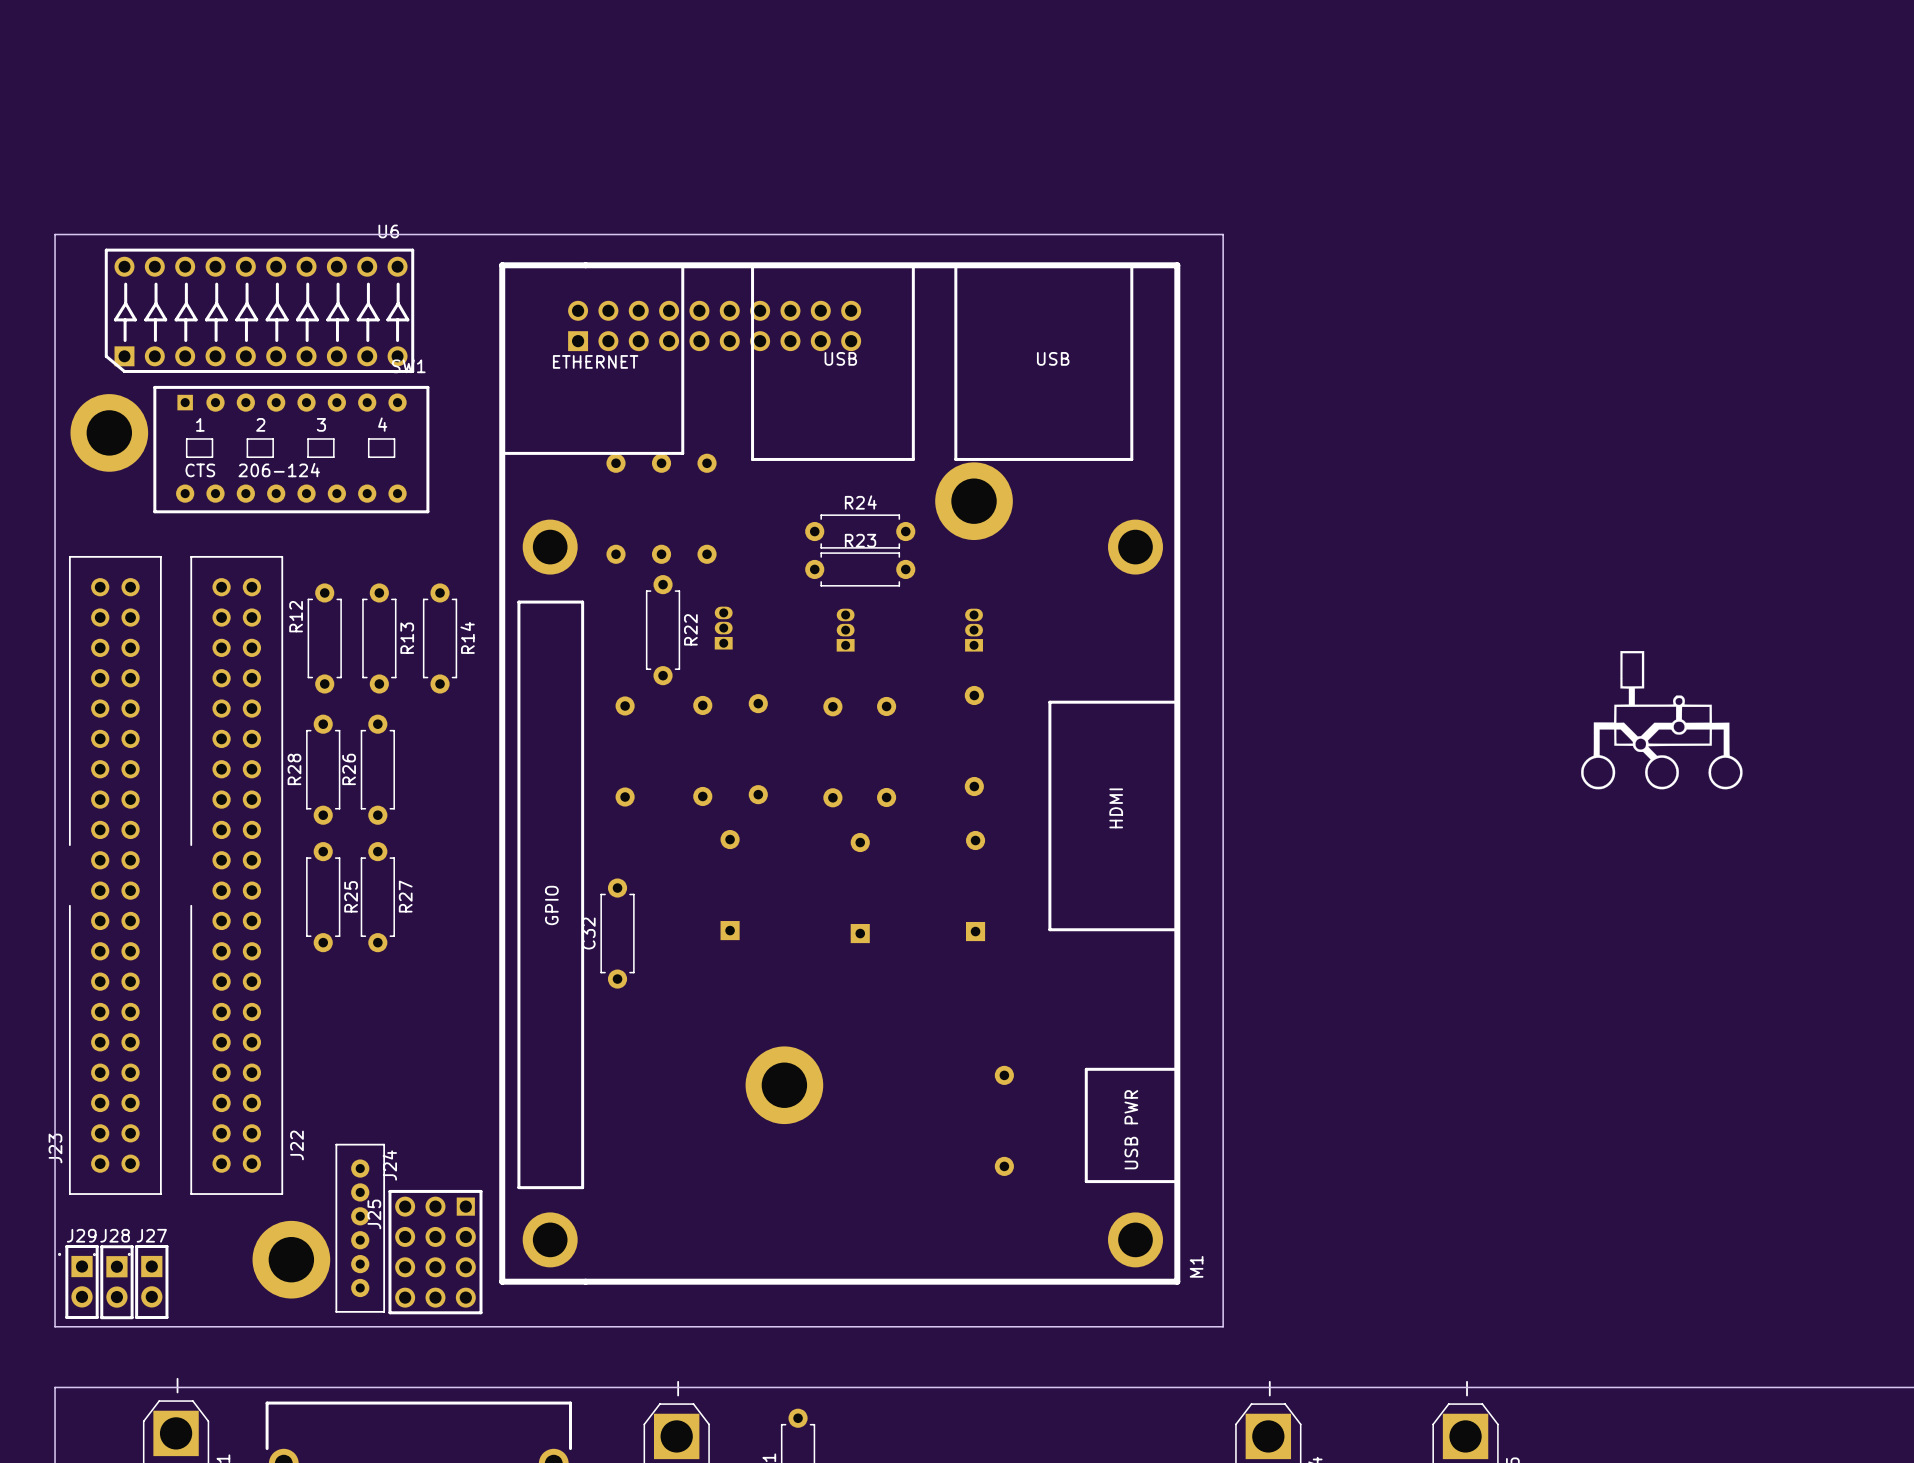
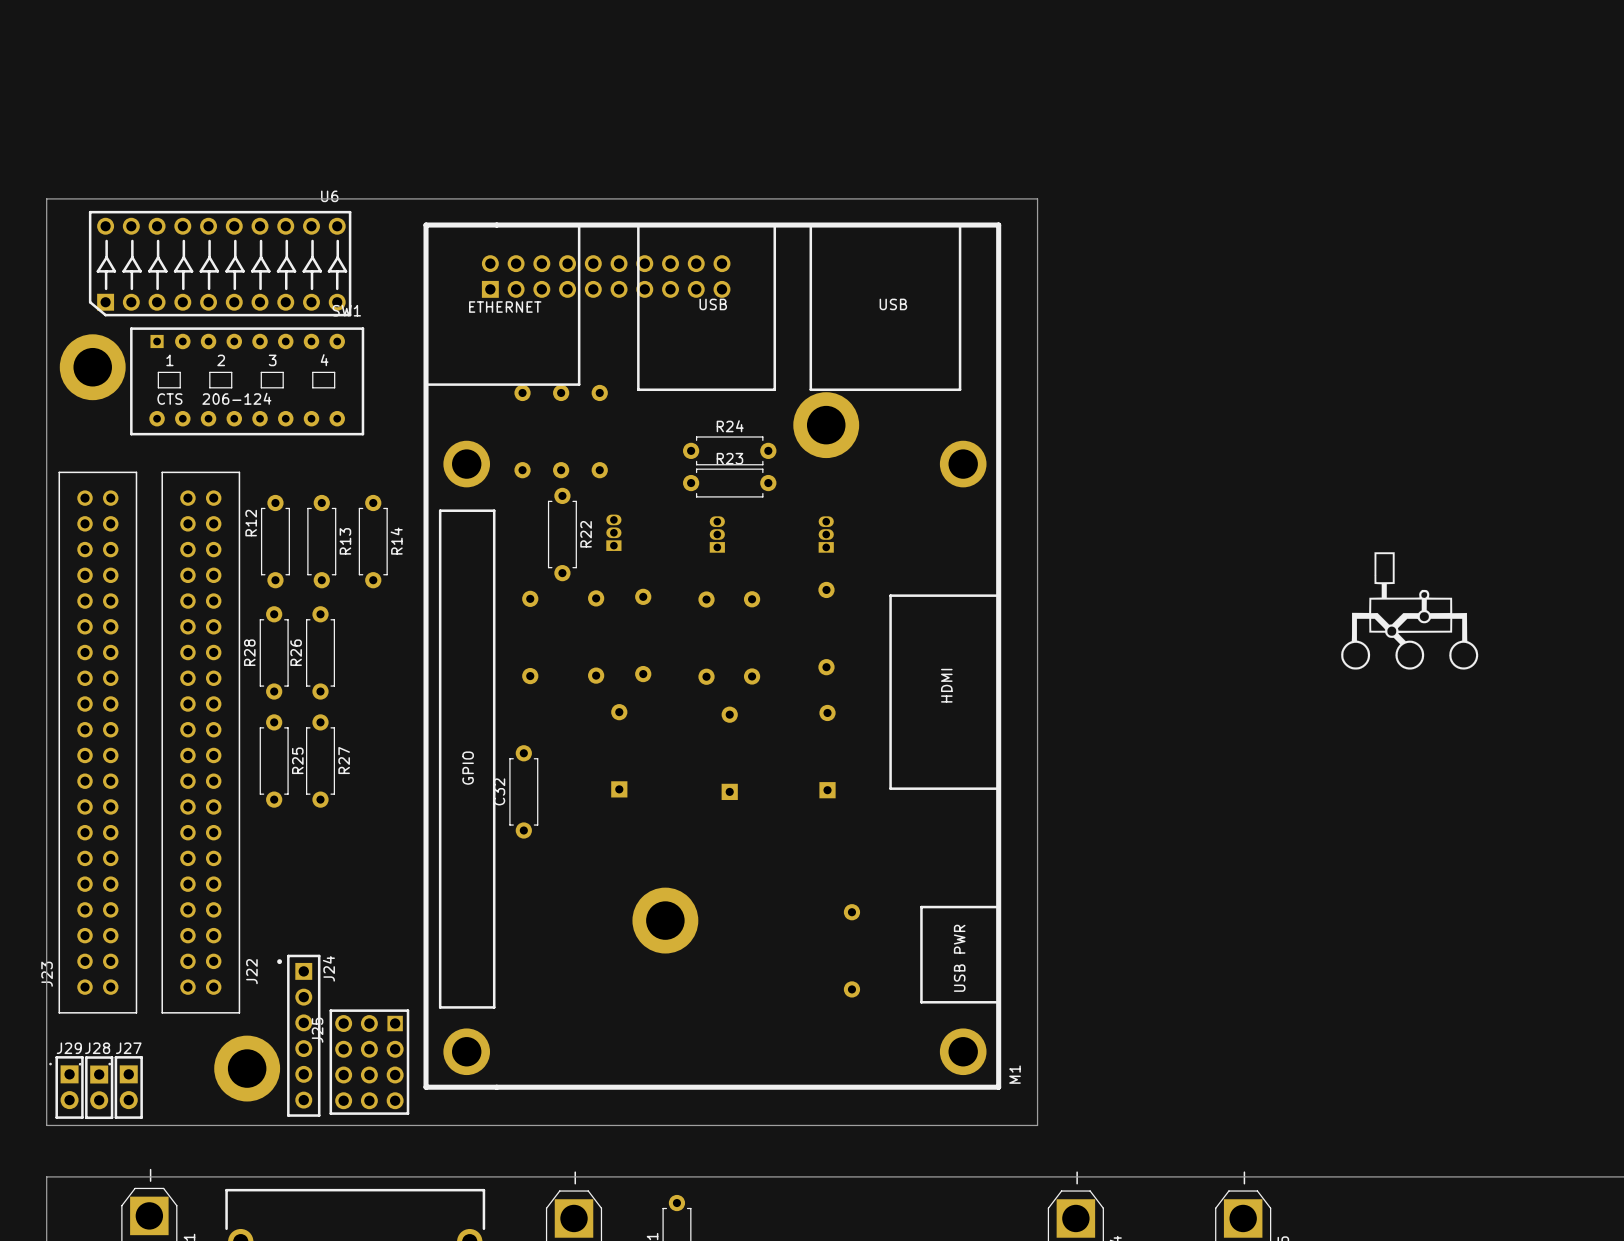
J23 footprint: [68, 555, 162, 1195] -> [58, 471, 138, 1014]
J22 footprint: [190, 555, 284, 1195] -> [161, 471, 241, 1014]
J24 footprint: [335, 1143, 386, 1313] -> [277, 954, 321, 1117]

